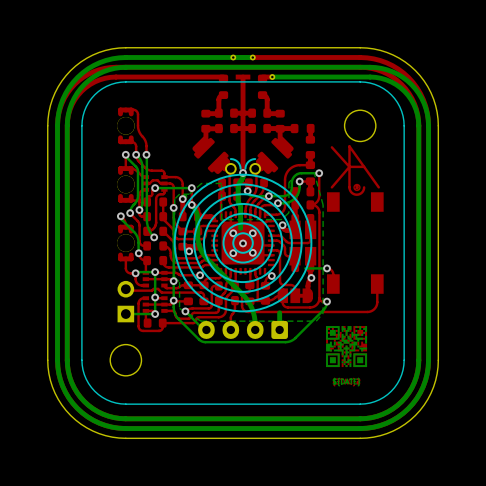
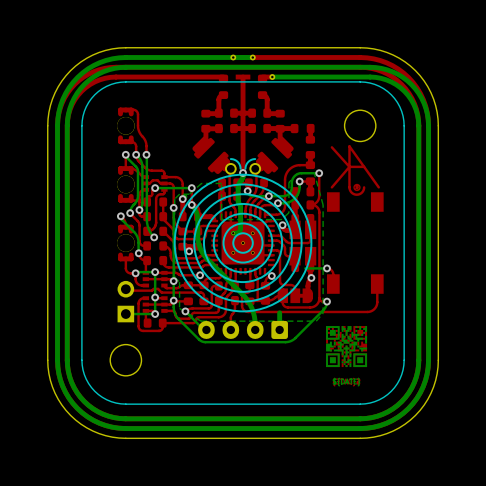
part footprint: [211, 211, 275, 275] -> [211, 211, 275, 275]
bottom track: none -> (240, 228) (238, 232) (233, 233)
via: (233, 233) -> none
via: (252, 233) -> none
via: (243, 243) -> none
via: (252, 252) -> none
via: (233, 253) -> none

